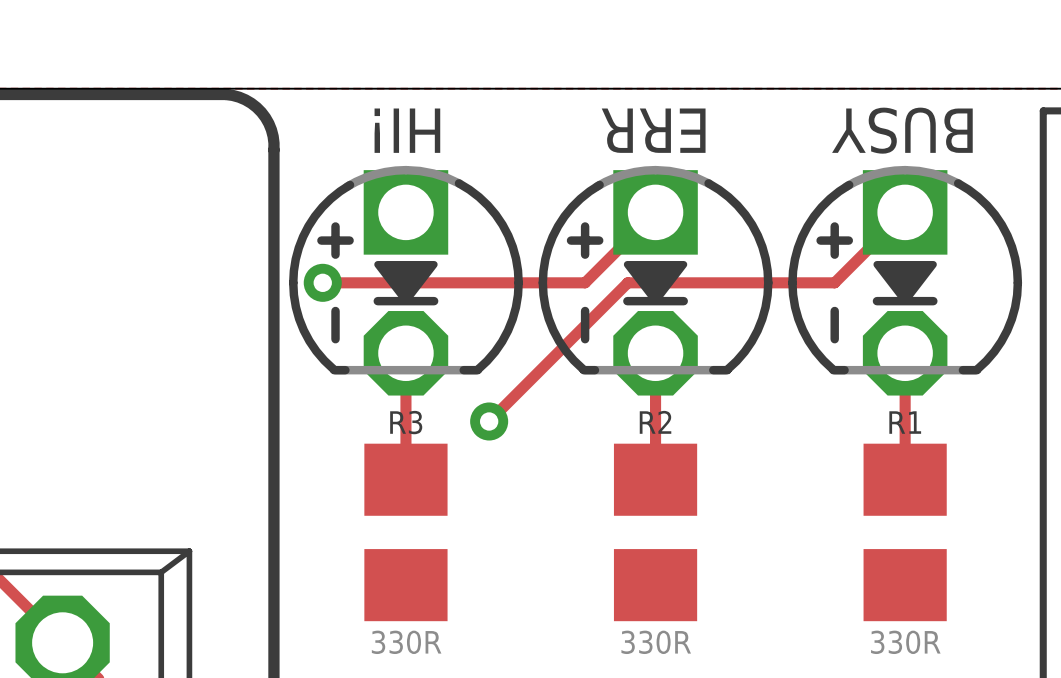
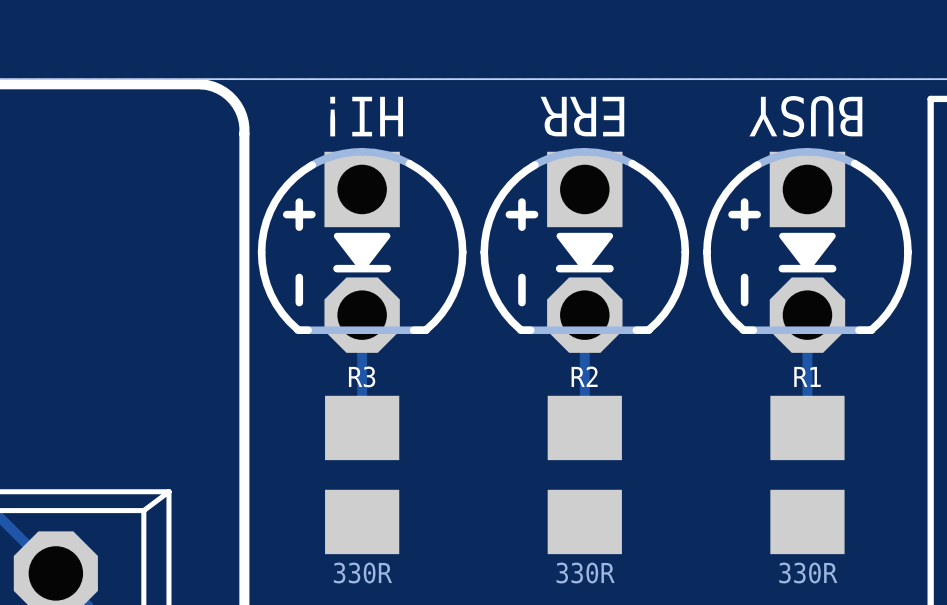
track: (655, 212) (585, 282) (322, 282) -> none
track: (905, 212) (834, 282) (627, 282) (489, 421) -> none
via: (322, 282) -> none
via: (489, 421) -> none

